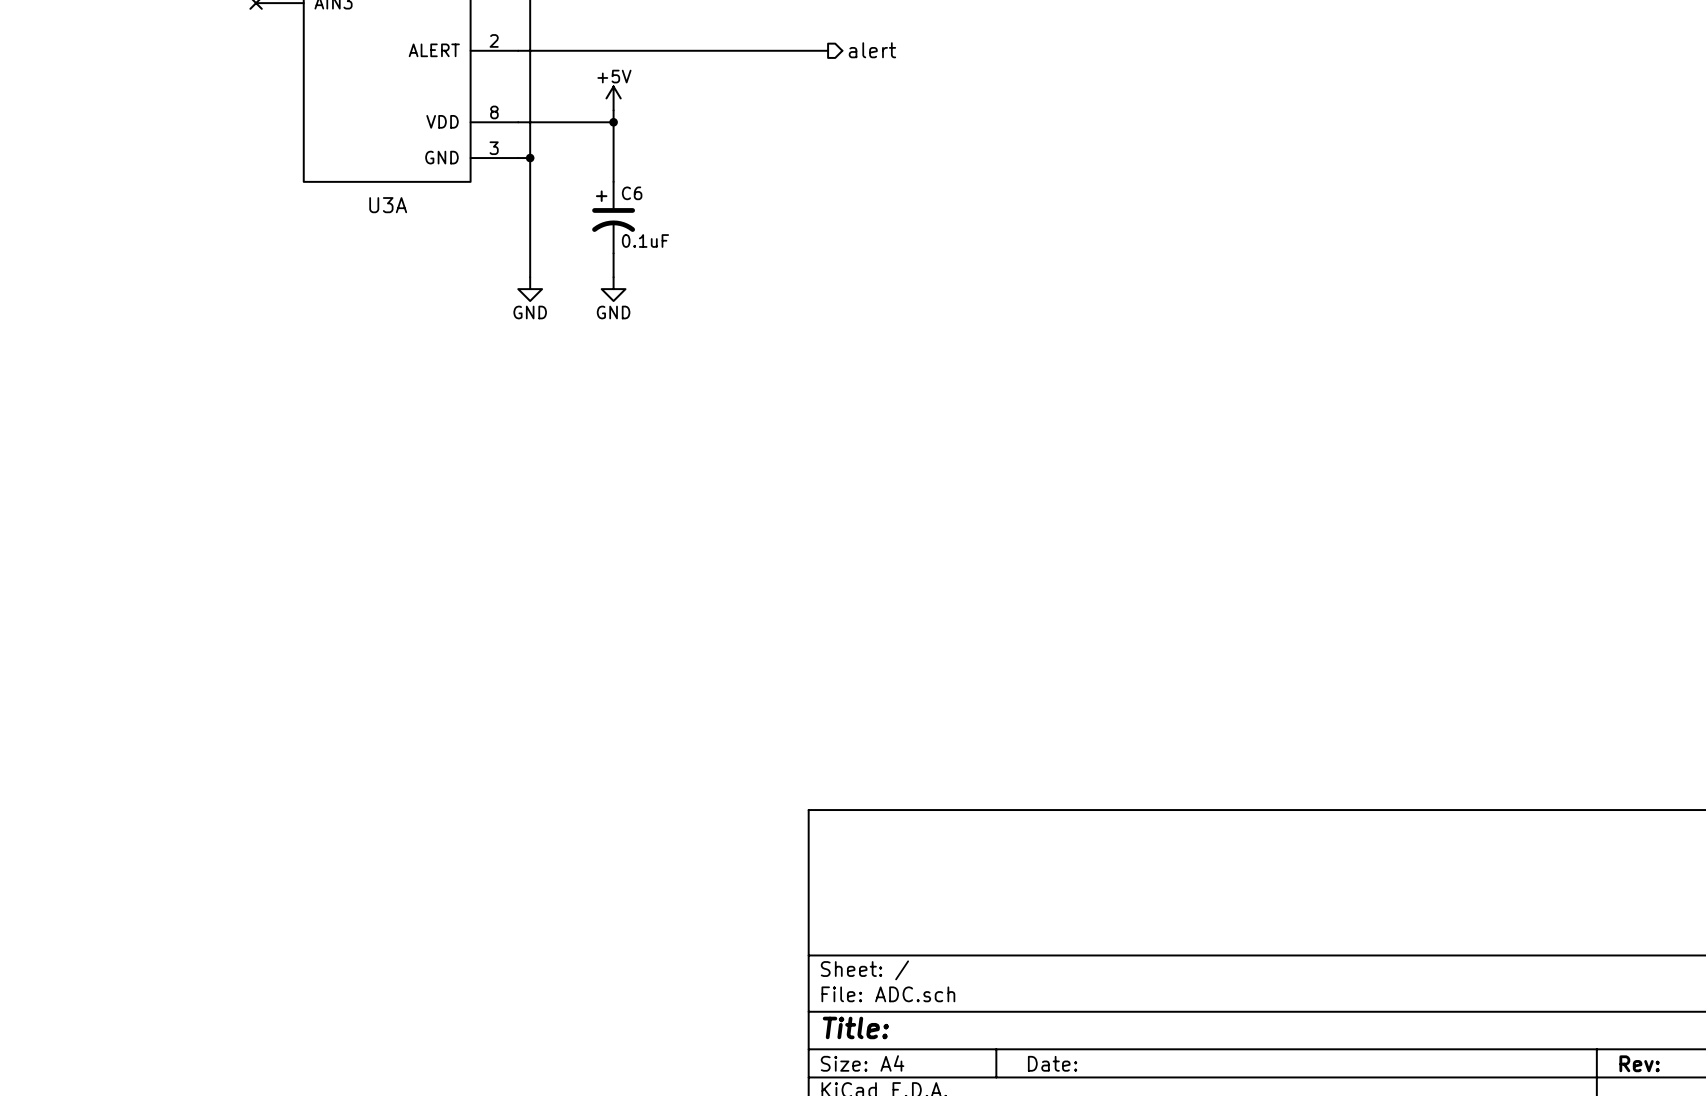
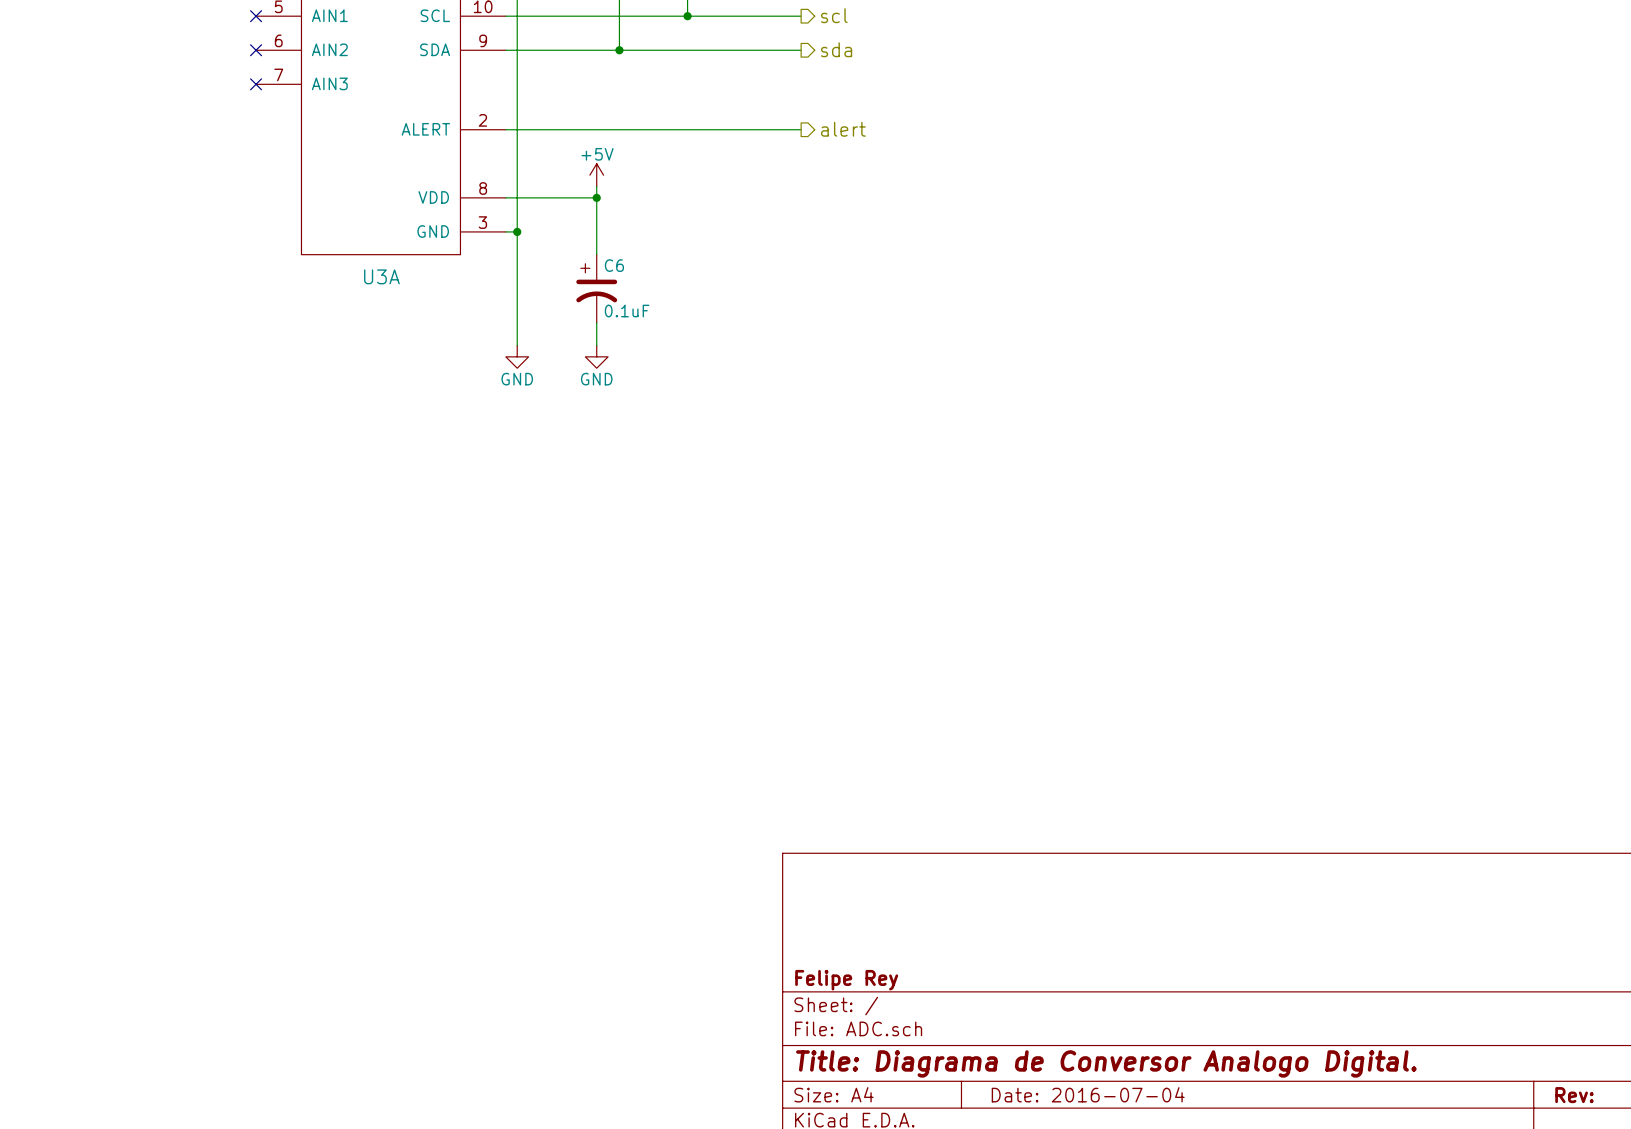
title block: none -> Felipe Rey (846, 980)
title block: Title: (855, 1027) -> Title: Diagrama de Conversor Analogo Digital. (1106, 1063)
title block: Date: (1052, 1063) -> Date: 2016-07-04 (1088, 1094)

